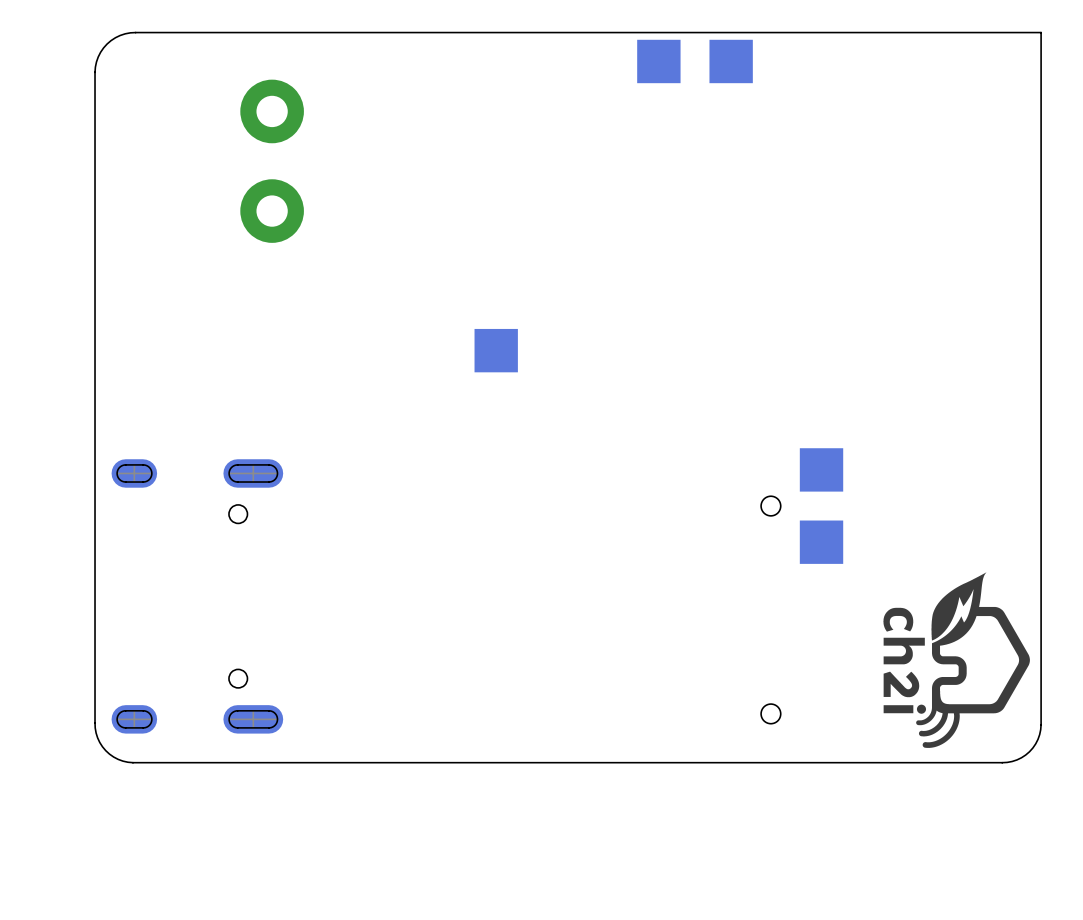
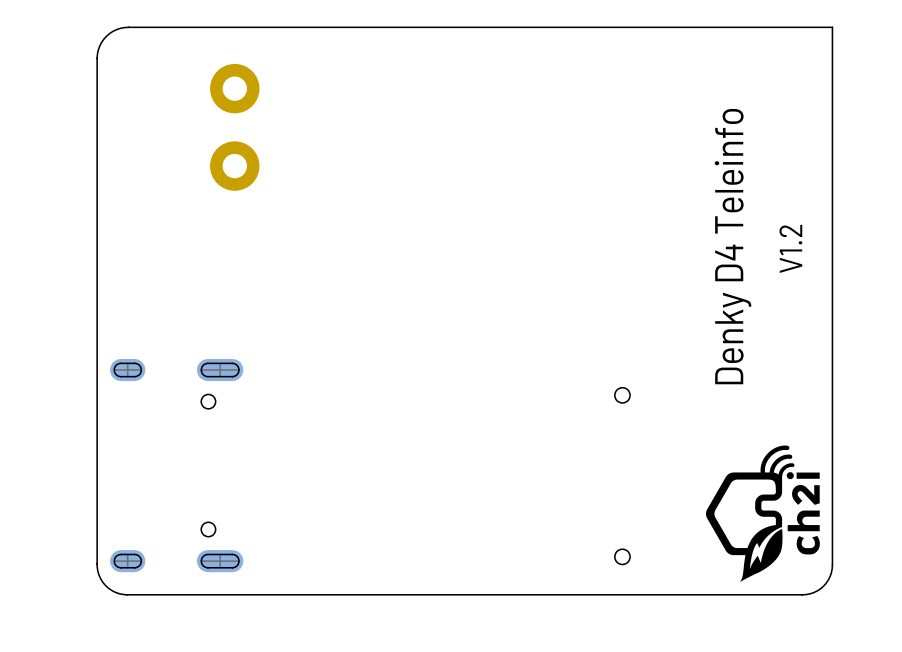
part: (658, 61) -> none
part: (731, 61) -> none
text: none -> Denky D4 Teleinfo (733, 246)
text: none -> V1.2 (790, 248)
part: (496, 350) -> none
part: (821, 469) -> none
part: (821, 542) -> none
drawing shape: [883, 572, 1030, 748] -> [706, 445, 820, 583]

